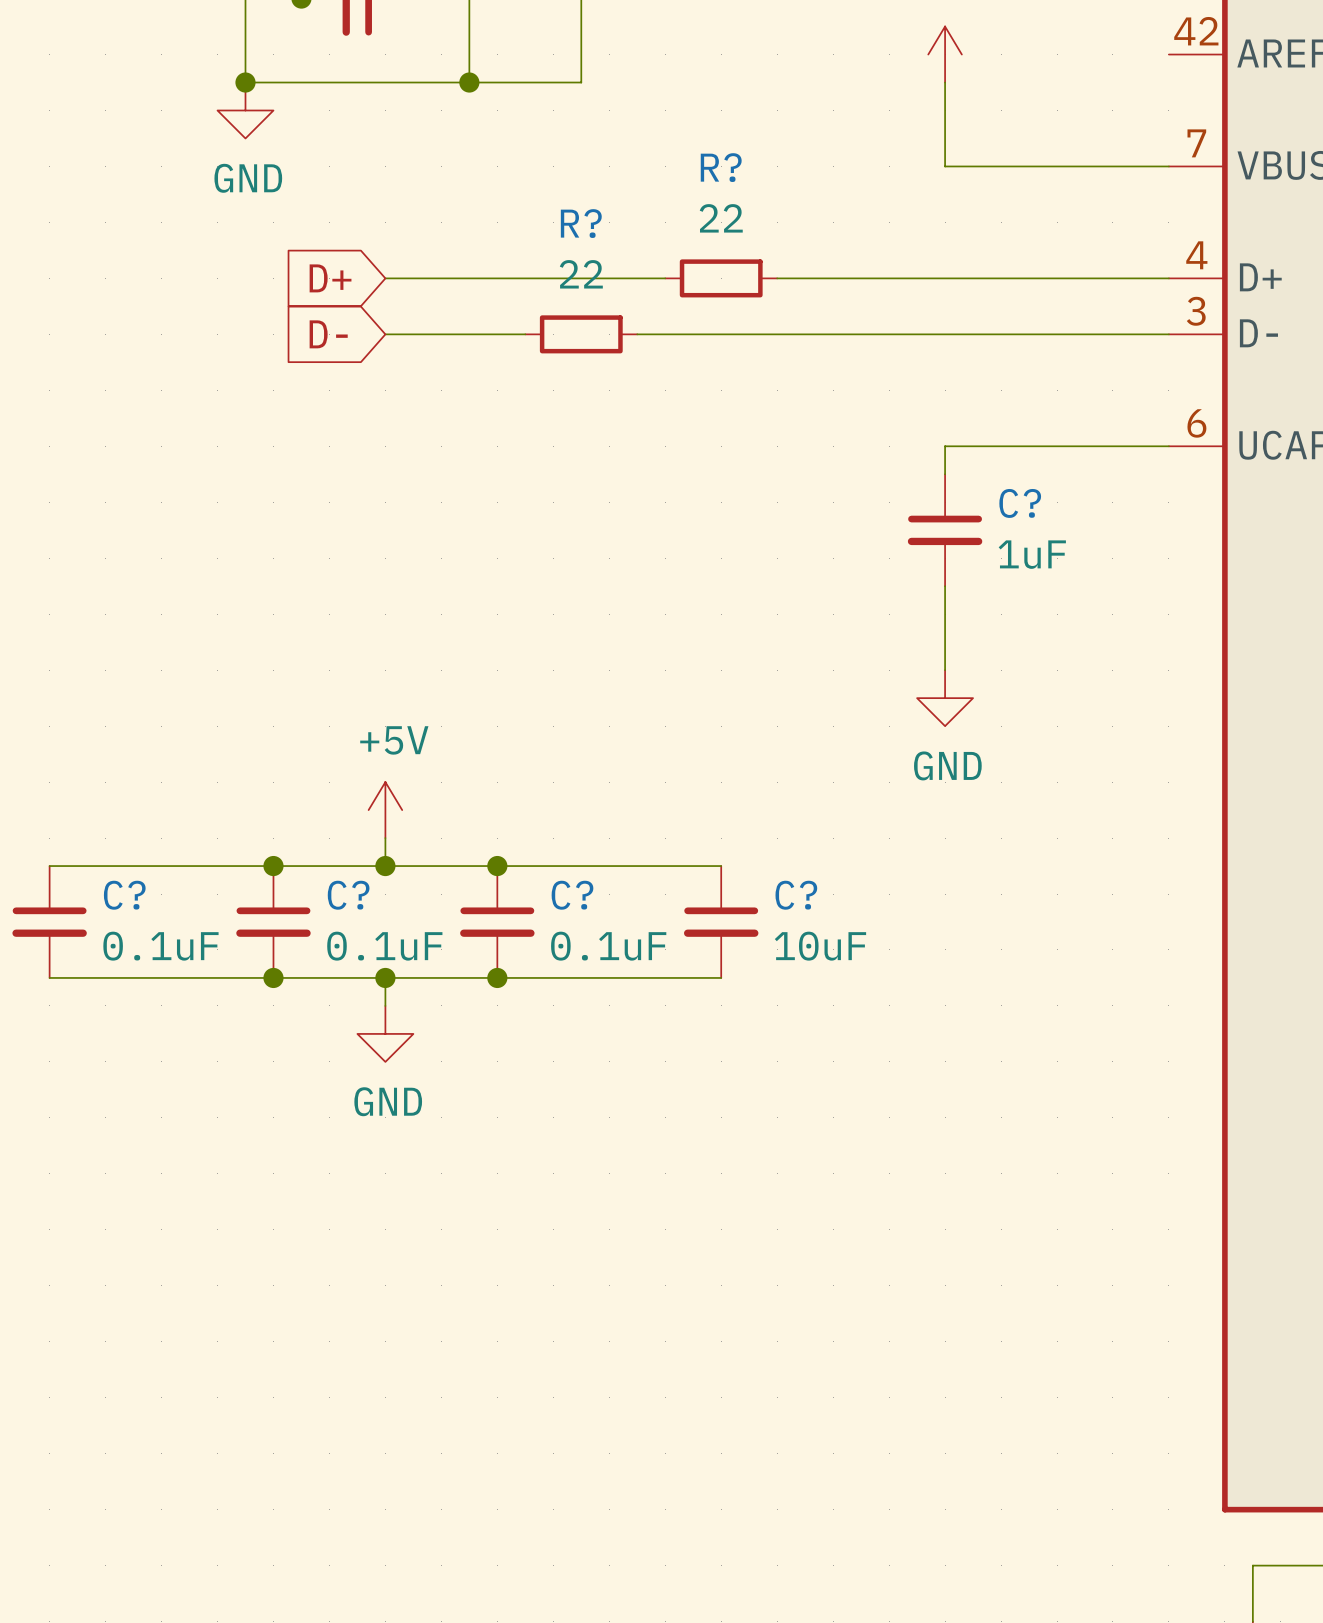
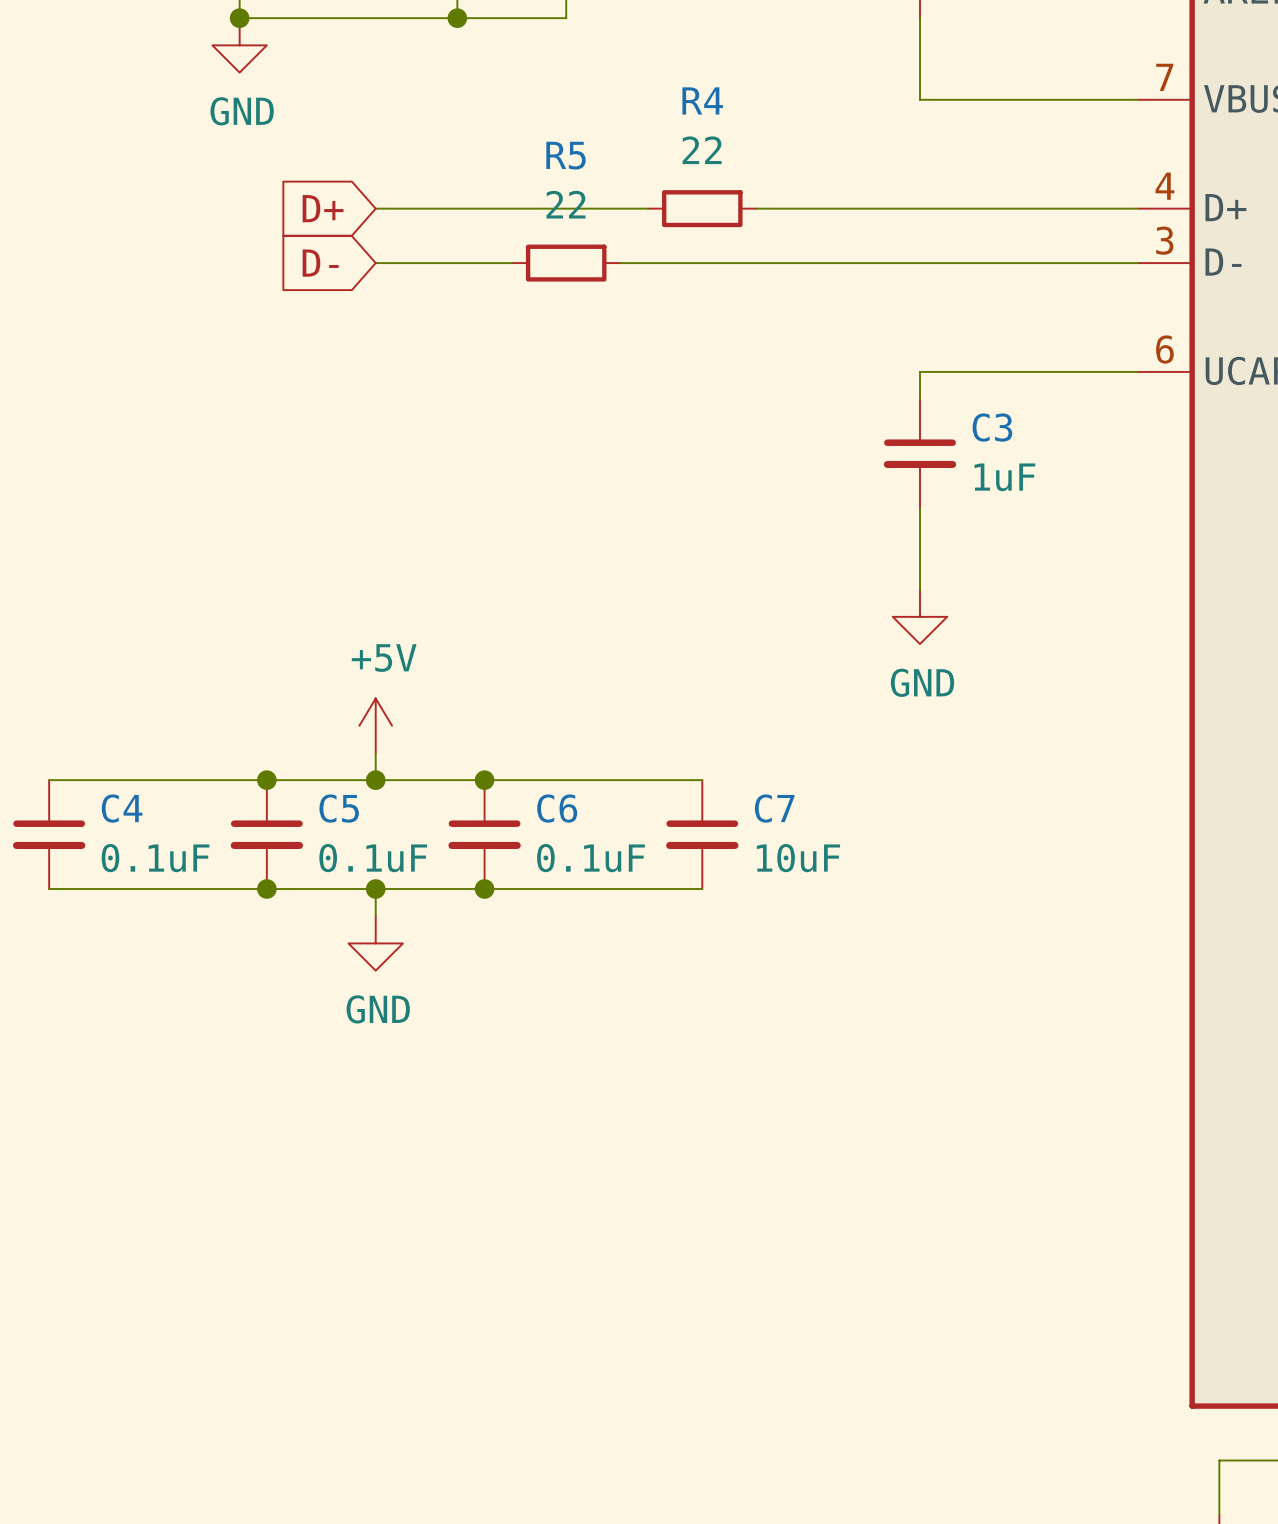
R? name: R? (721, 167) -> R4 (702, 100)
R? name: R? (581, 223) -> R5 (566, 155)
C? name: C? (1020, 503) -> C3 (992, 427)
C? name: C? (124, 895) -> C4 (122, 808)
C? name: C? (348, 895) -> C5 (339, 808)
C? name: C? (572, 895) -> C6 (557, 808)
C? name: C? (796, 895) -> C7 (774, 808)

